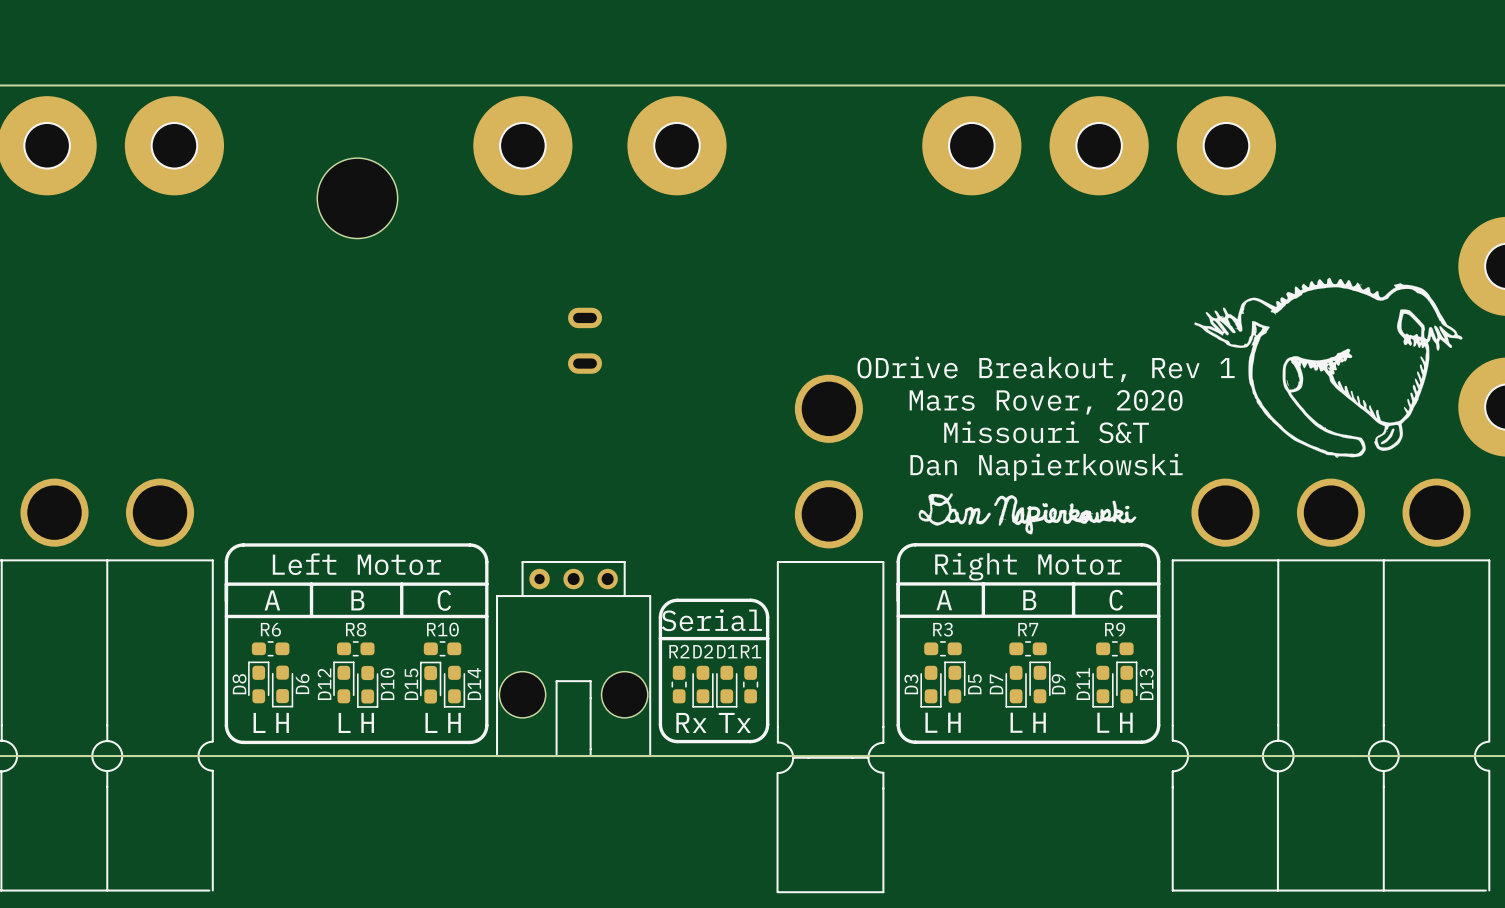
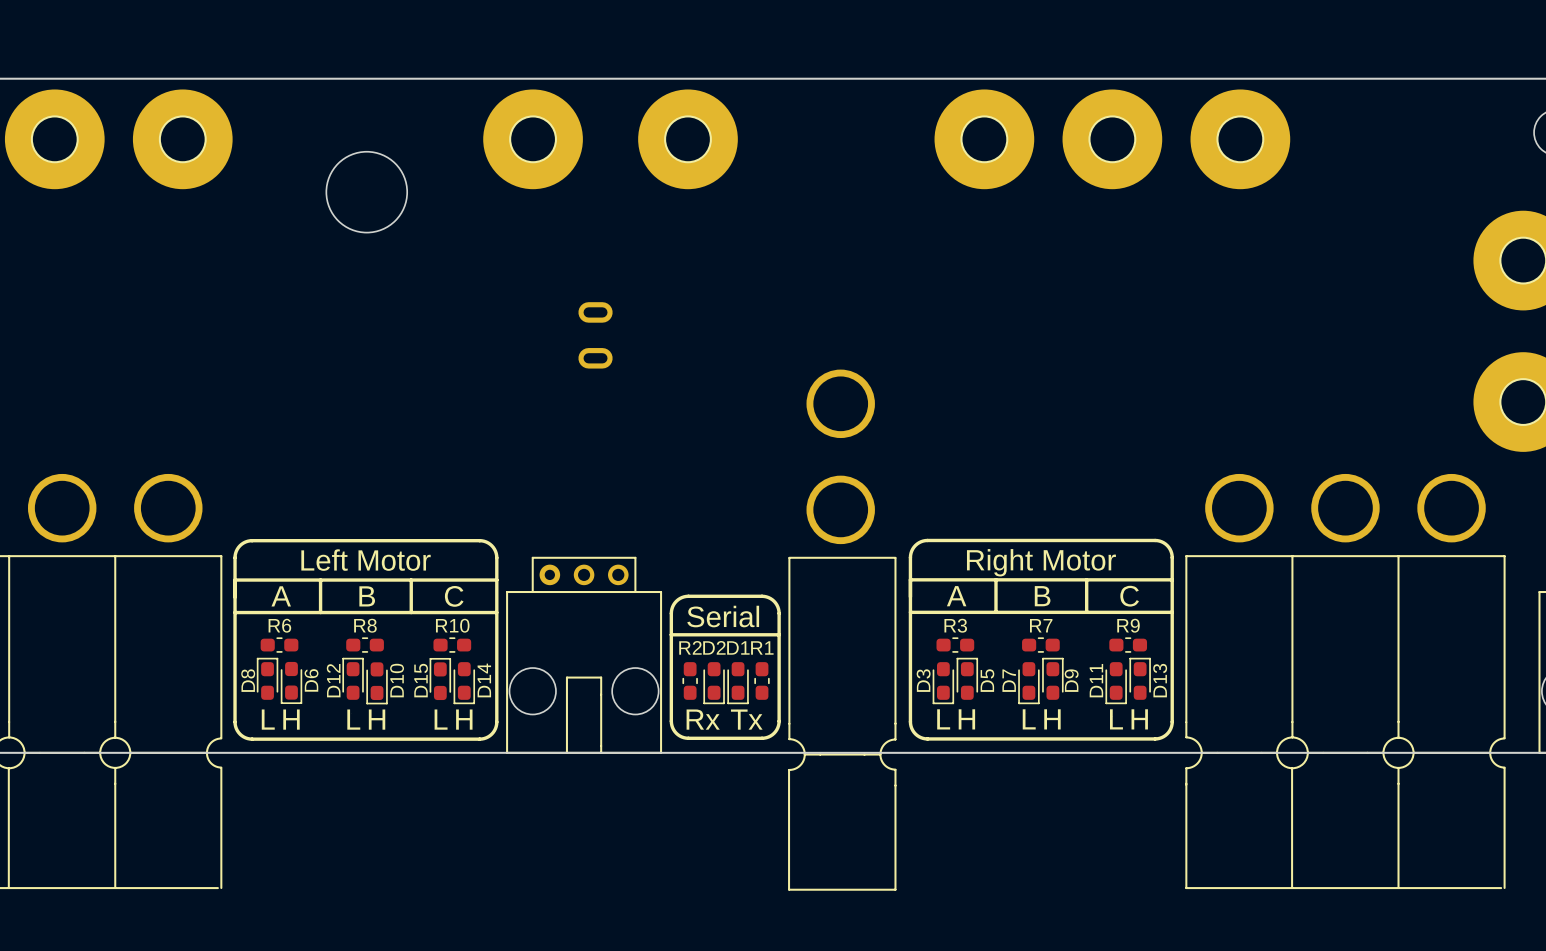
drawing: [1194, 277, 1463, 458] -> none
text: ODrive Breakout, Rev 1 (1046, 369) -> none
text: Mars Rover, 2020 (1046, 402) -> none
text: Missouri S&T (1046, 432) -> none
text: Dan Napierkowski (1046, 467) -> none
drawing: [918, 493, 1137, 535] -> none

